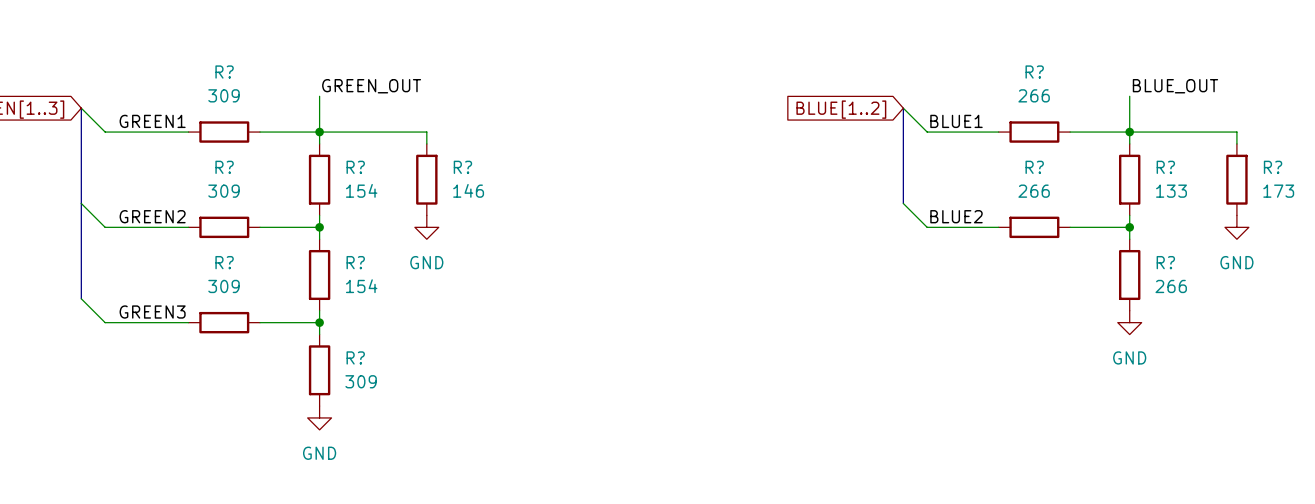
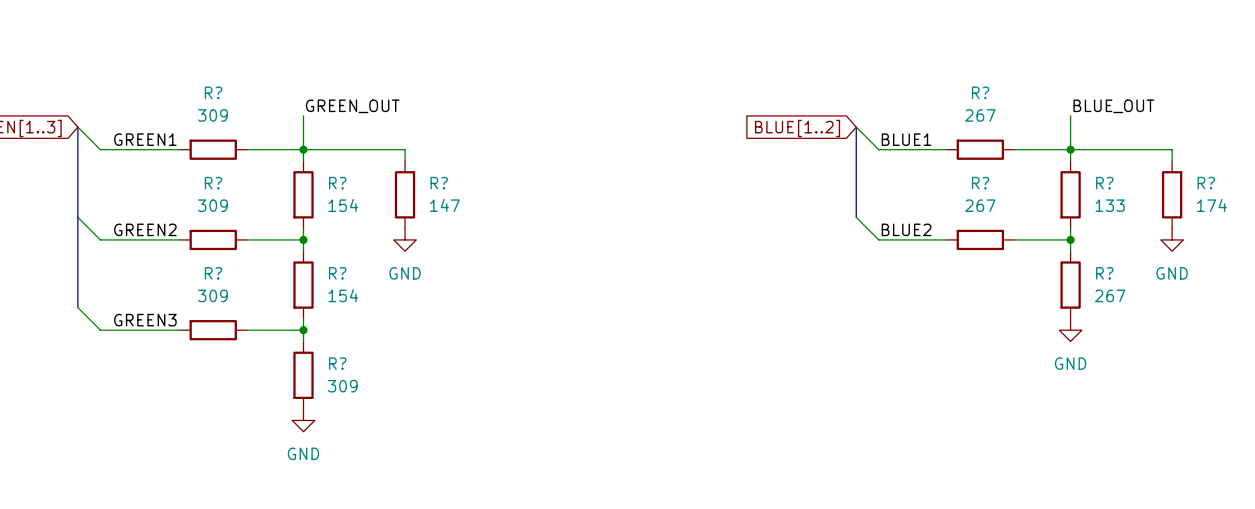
R? value: 266 (1034, 95) -> 267 (980, 115)
R? value: 146 (468, 190) -> 147 (444, 205)
R? value: 266 (1034, 191) -> 267 (980, 205)
R? value: 173 (1278, 191) -> 174 (1211, 205)
R? value: 266 (1171, 286) -> 267 (1110, 295)

